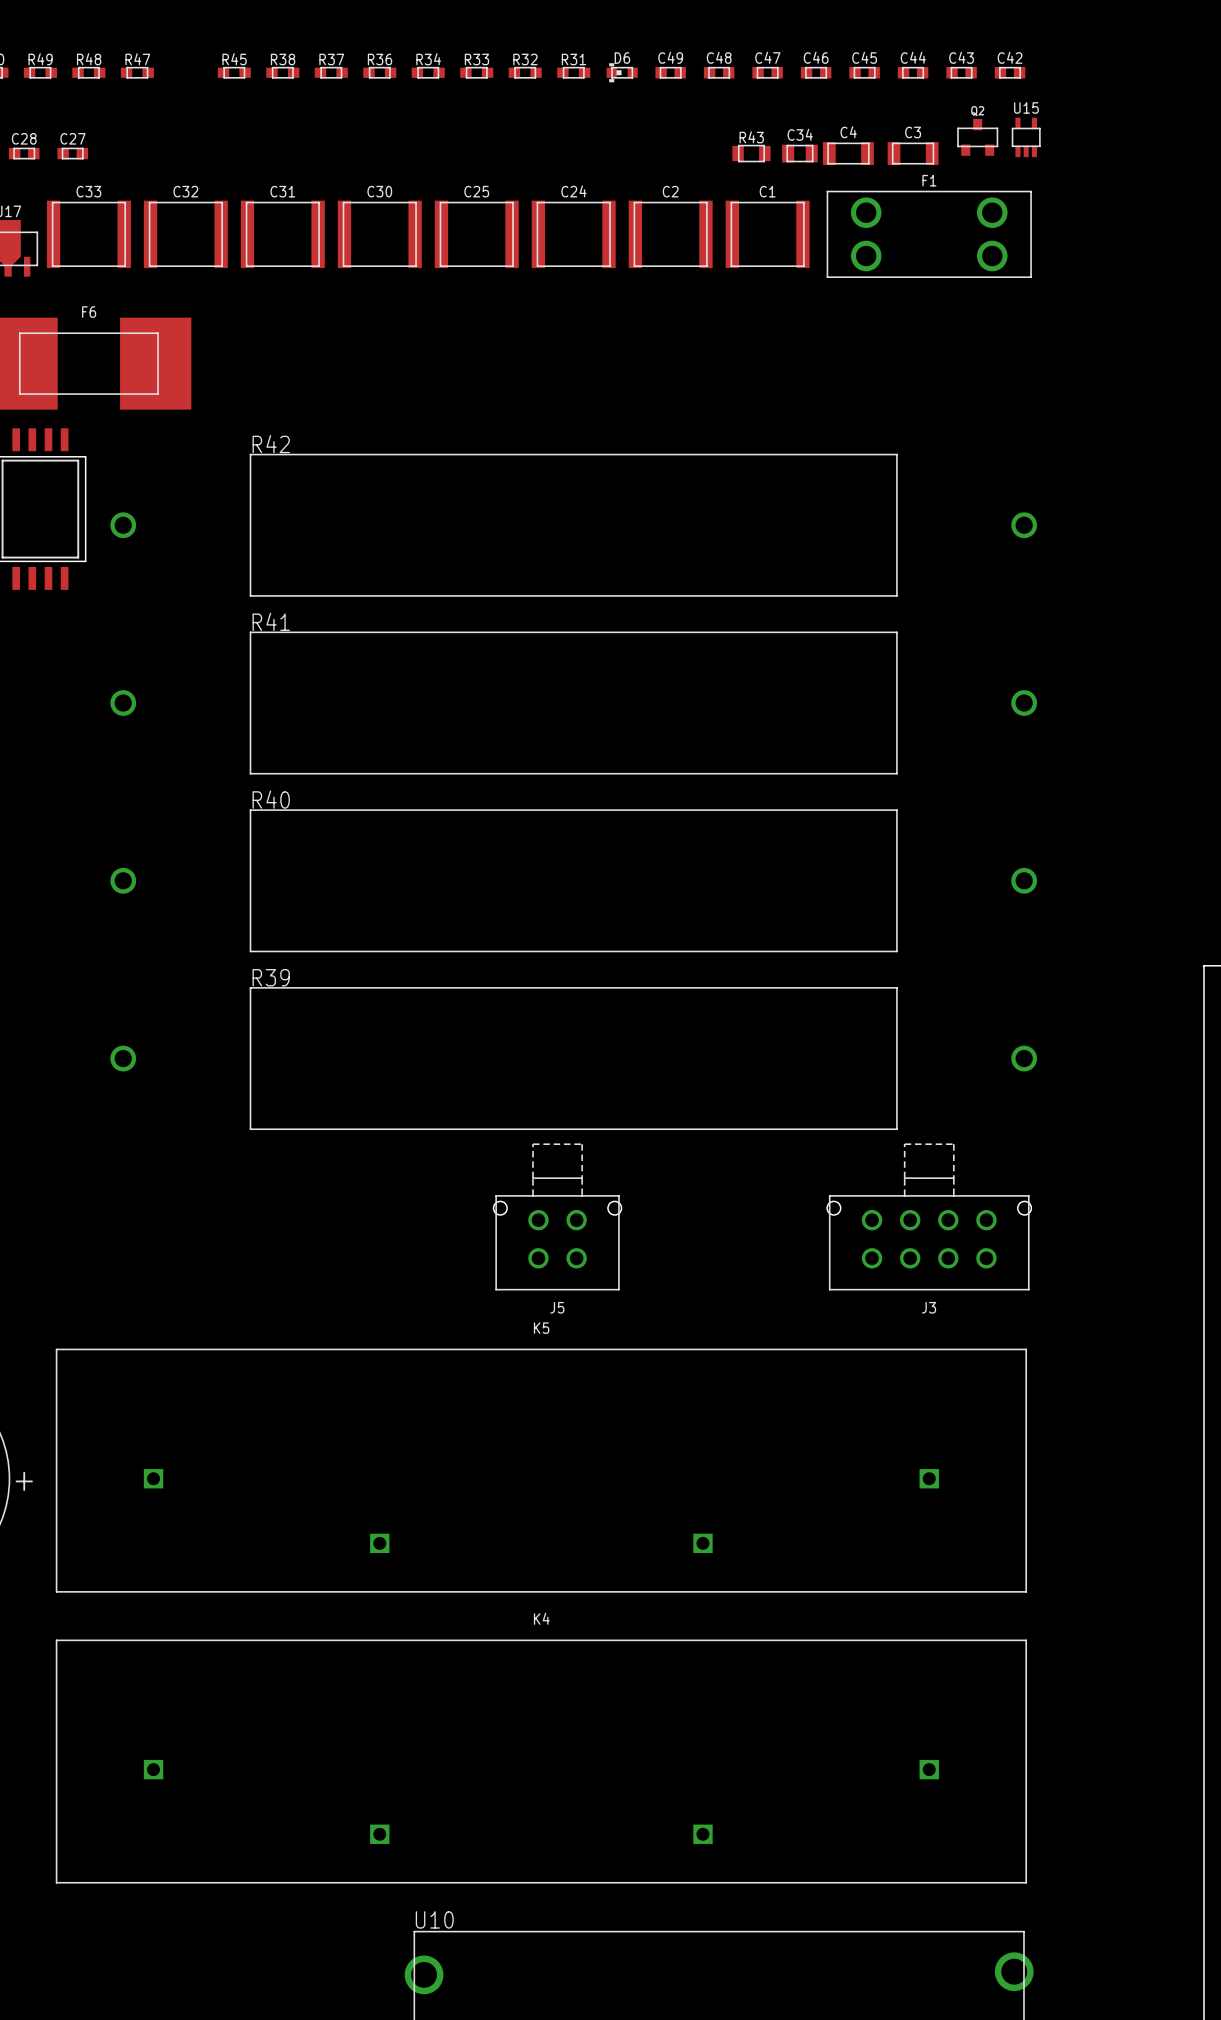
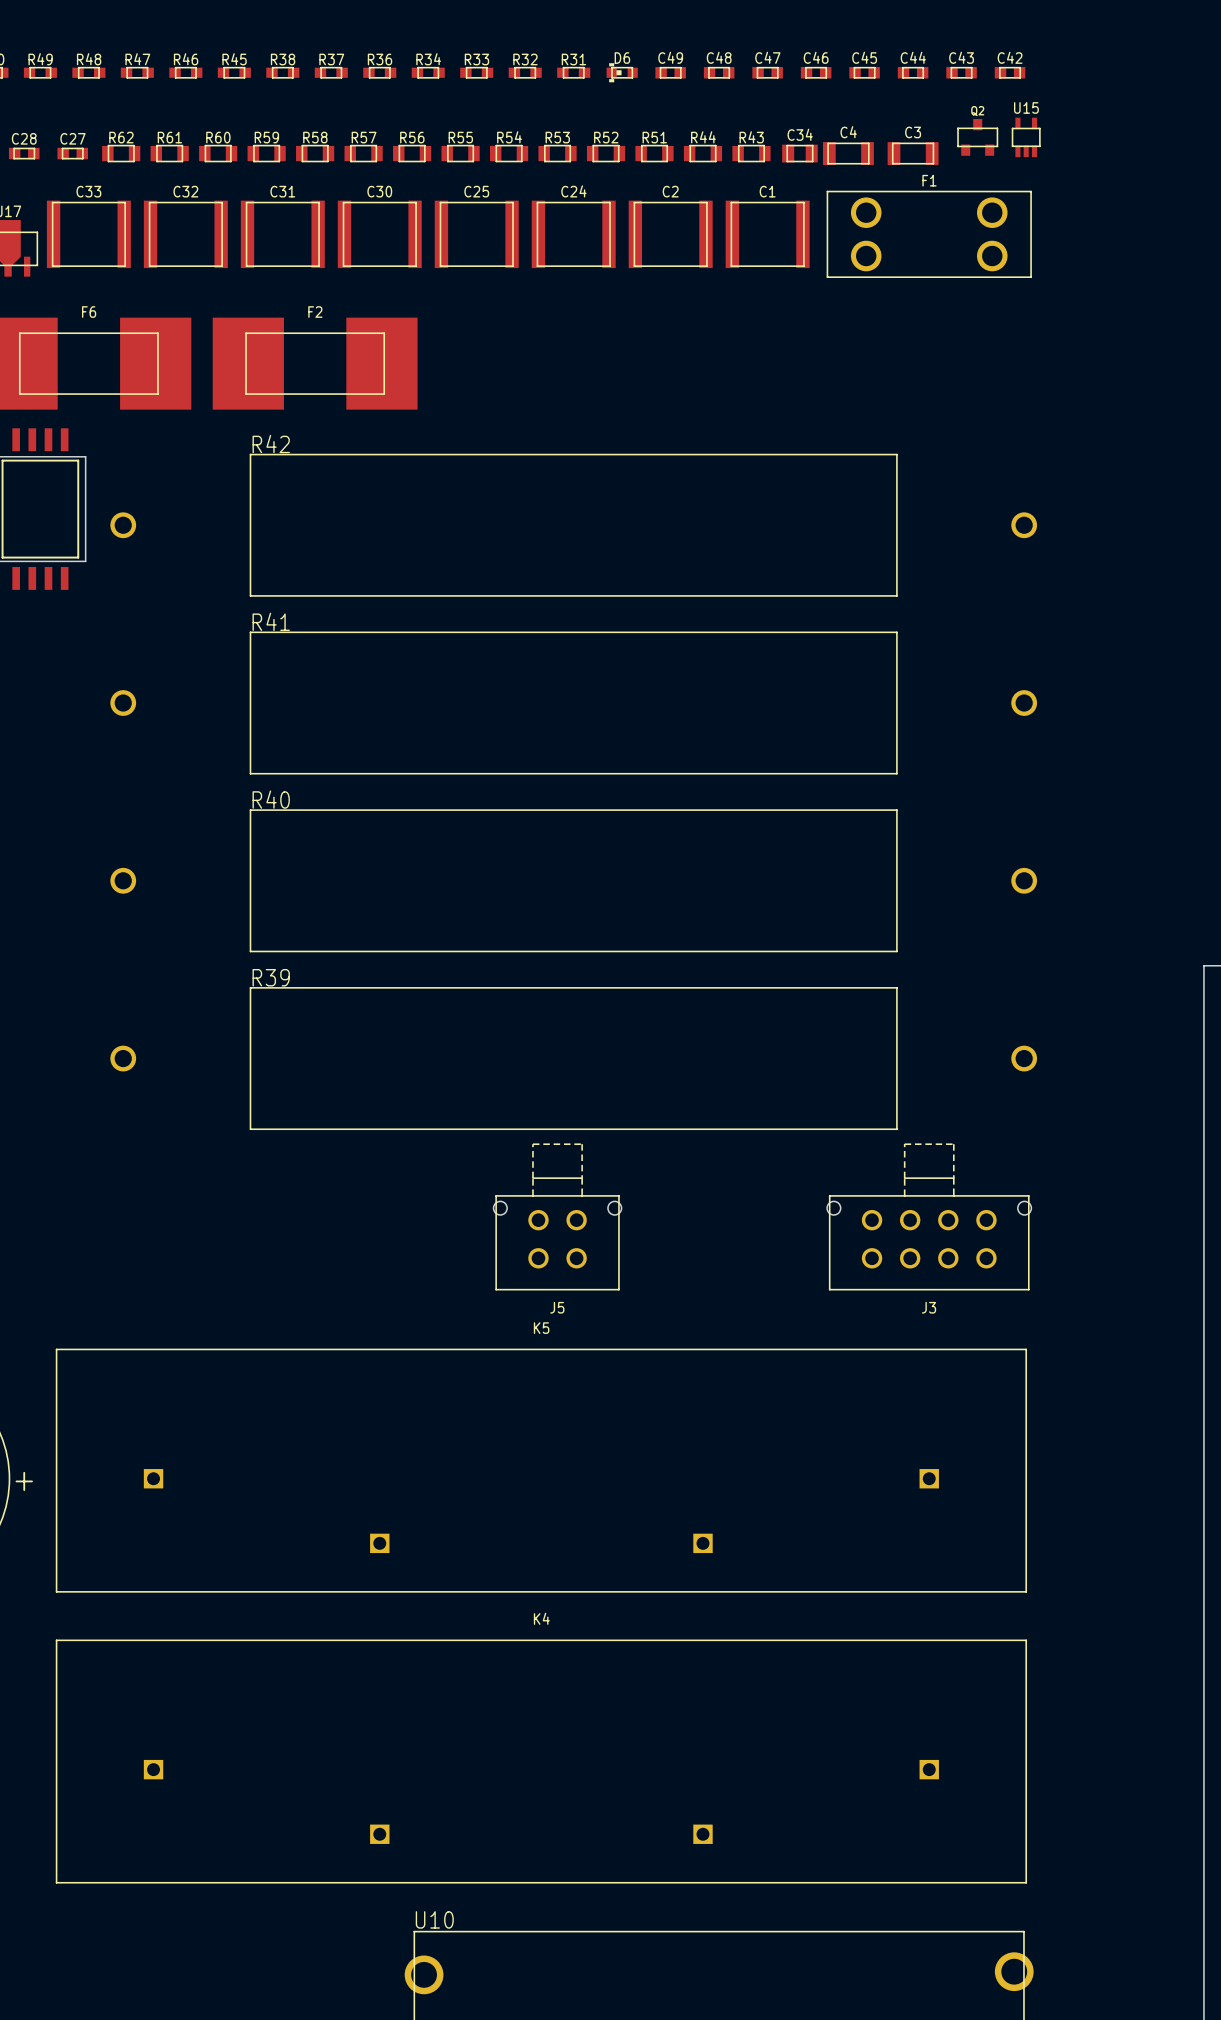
R46: none -> (185, 72)
R62: none -> (121, 153)
R61: none -> (169, 153)
R60: none -> (218, 153)
R59: none -> (266, 153)
R58: none -> (315, 153)
R57: none -> (363, 153)
R56: none -> (412, 153)
R55: none -> (460, 153)
R54: none -> (509, 153)
R53: none -> (557, 153)
R52: none -> (606, 153)
R51: none -> (654, 153)
R44: none -> (702, 153)
F2: none -> (315, 363)

